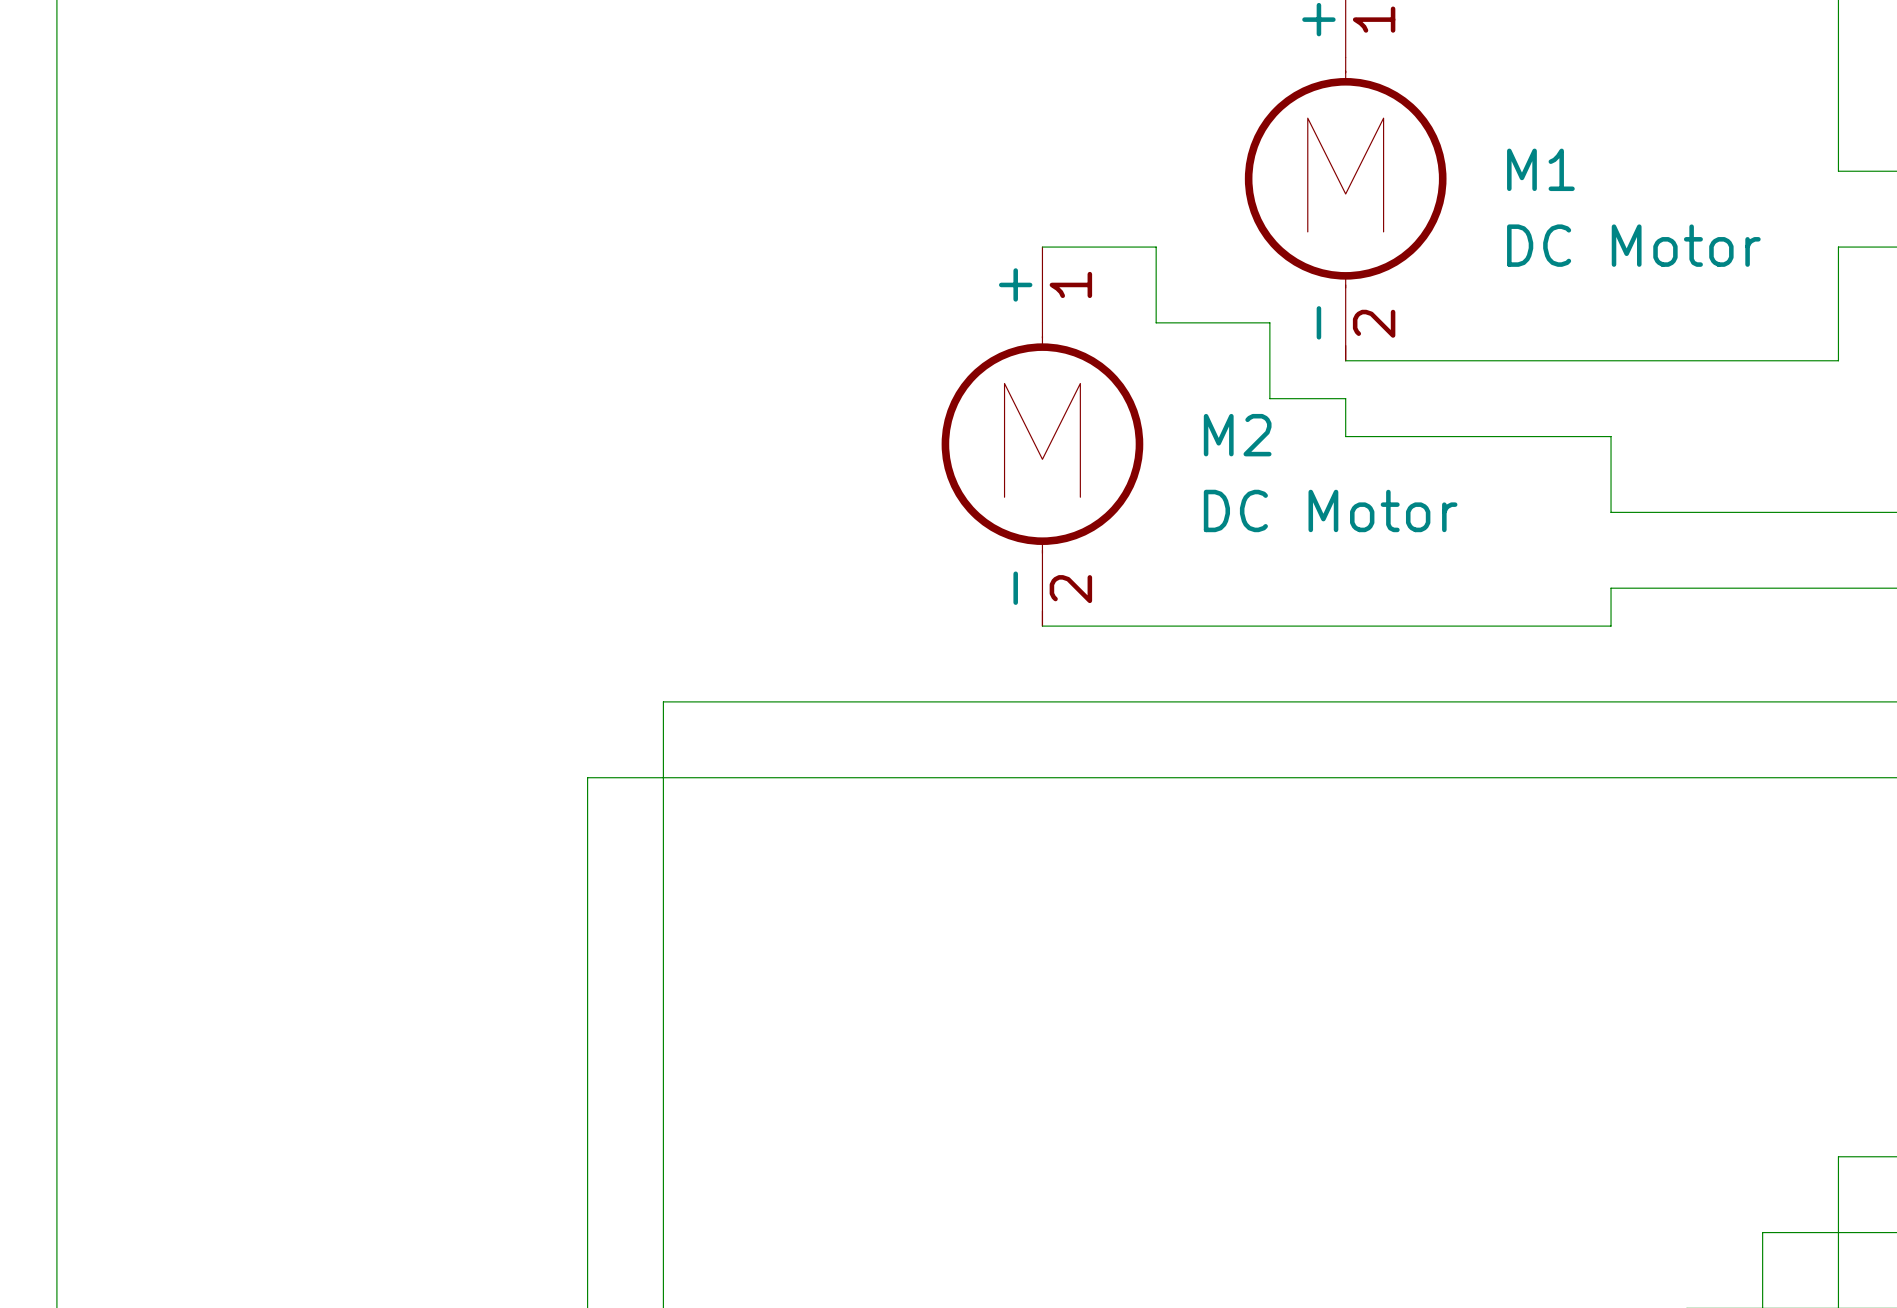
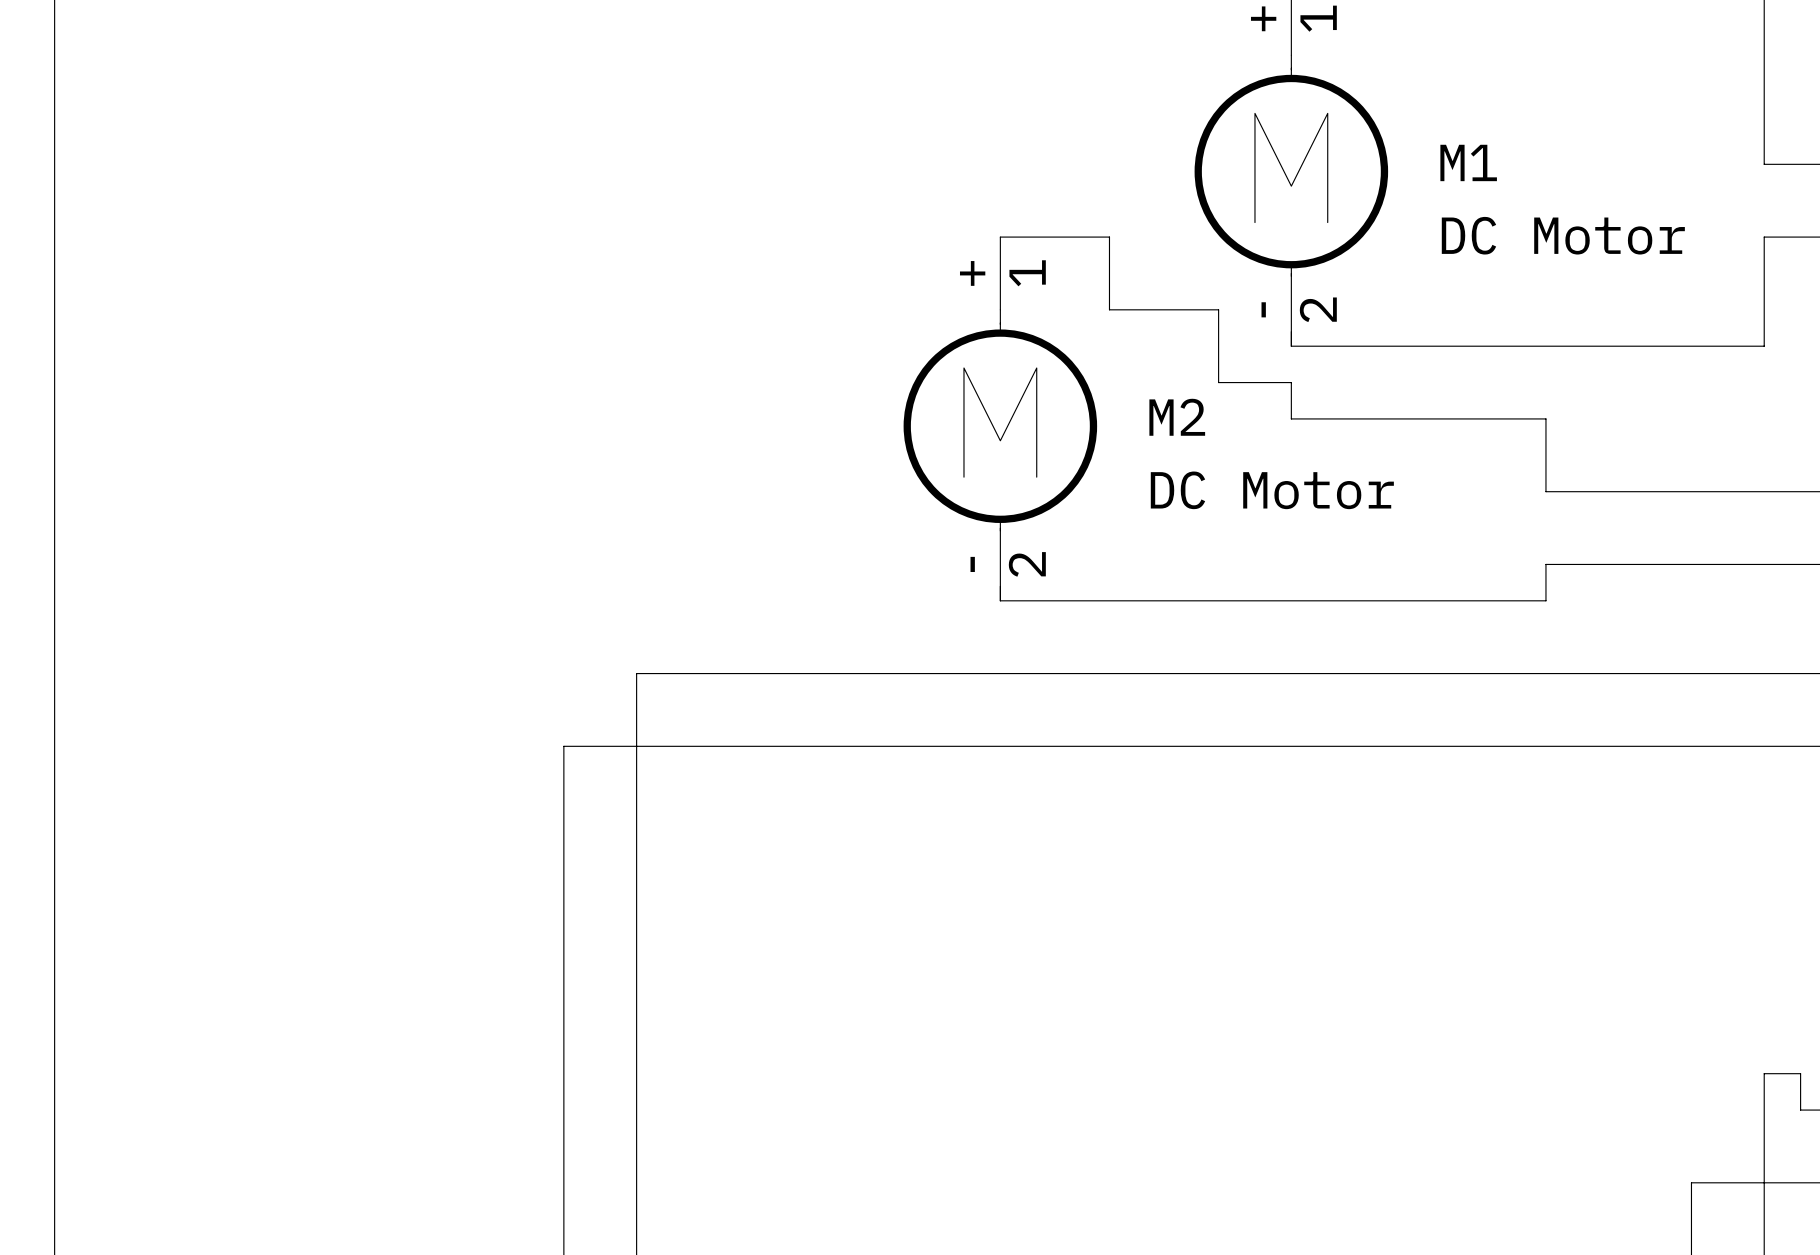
wire: (1838, 1156) (1876, 1156) -> (1764, 1110) (1764, 1073) (1800, 1073) (1800, 1110)

